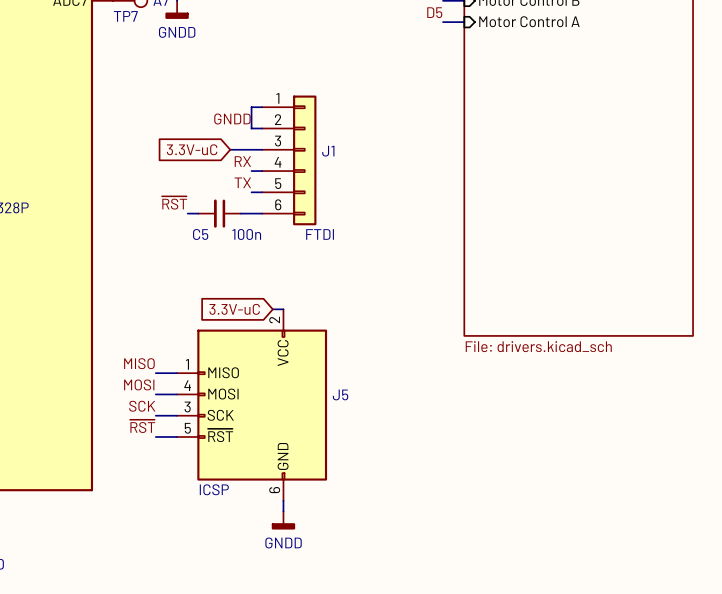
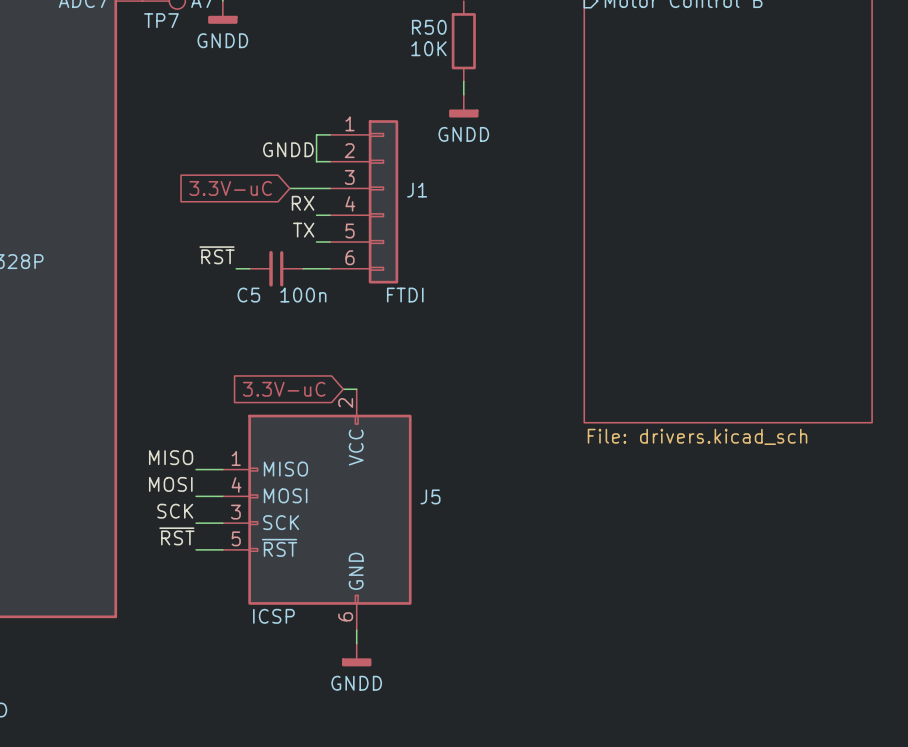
wire: (443, 0) (464, 0) -> none
label: D5 (434, 12) -> none
sheet pin: Motor Control A (529, 21) -> none
wire: (443, 22) (464, 22) -> none
R50: none -> 10K (463, 41)
wire: none -> (463, 81) (463, 94)
power symbol: none -> GNDD (463, 106)

